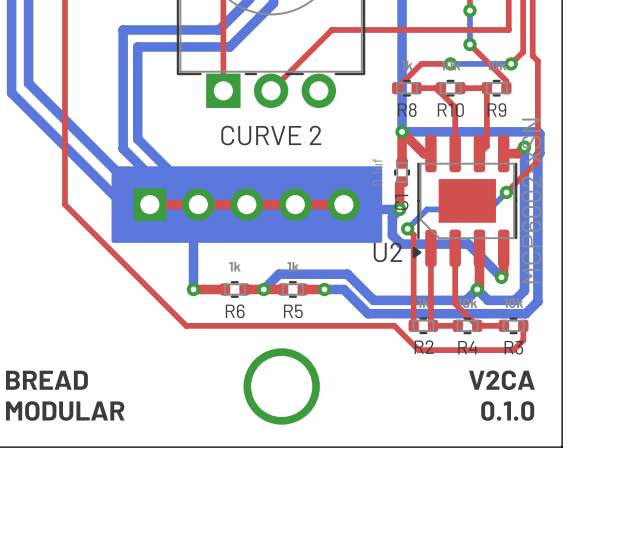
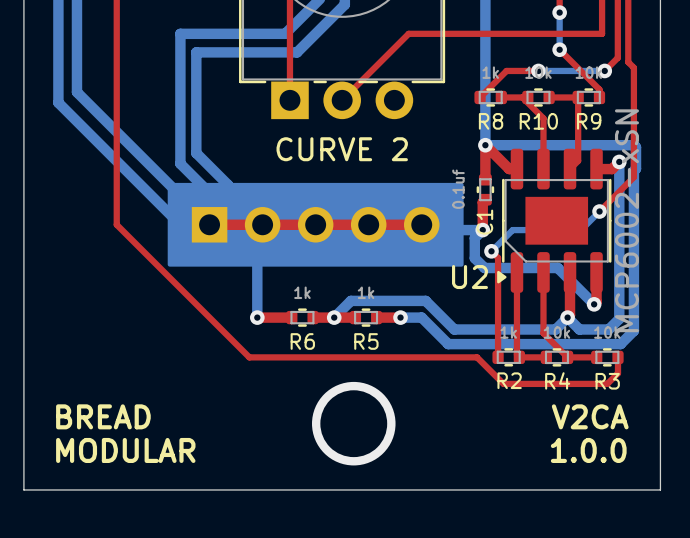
text: 0.1.0 (507, 411) -> 1.0.0 (588, 450)

